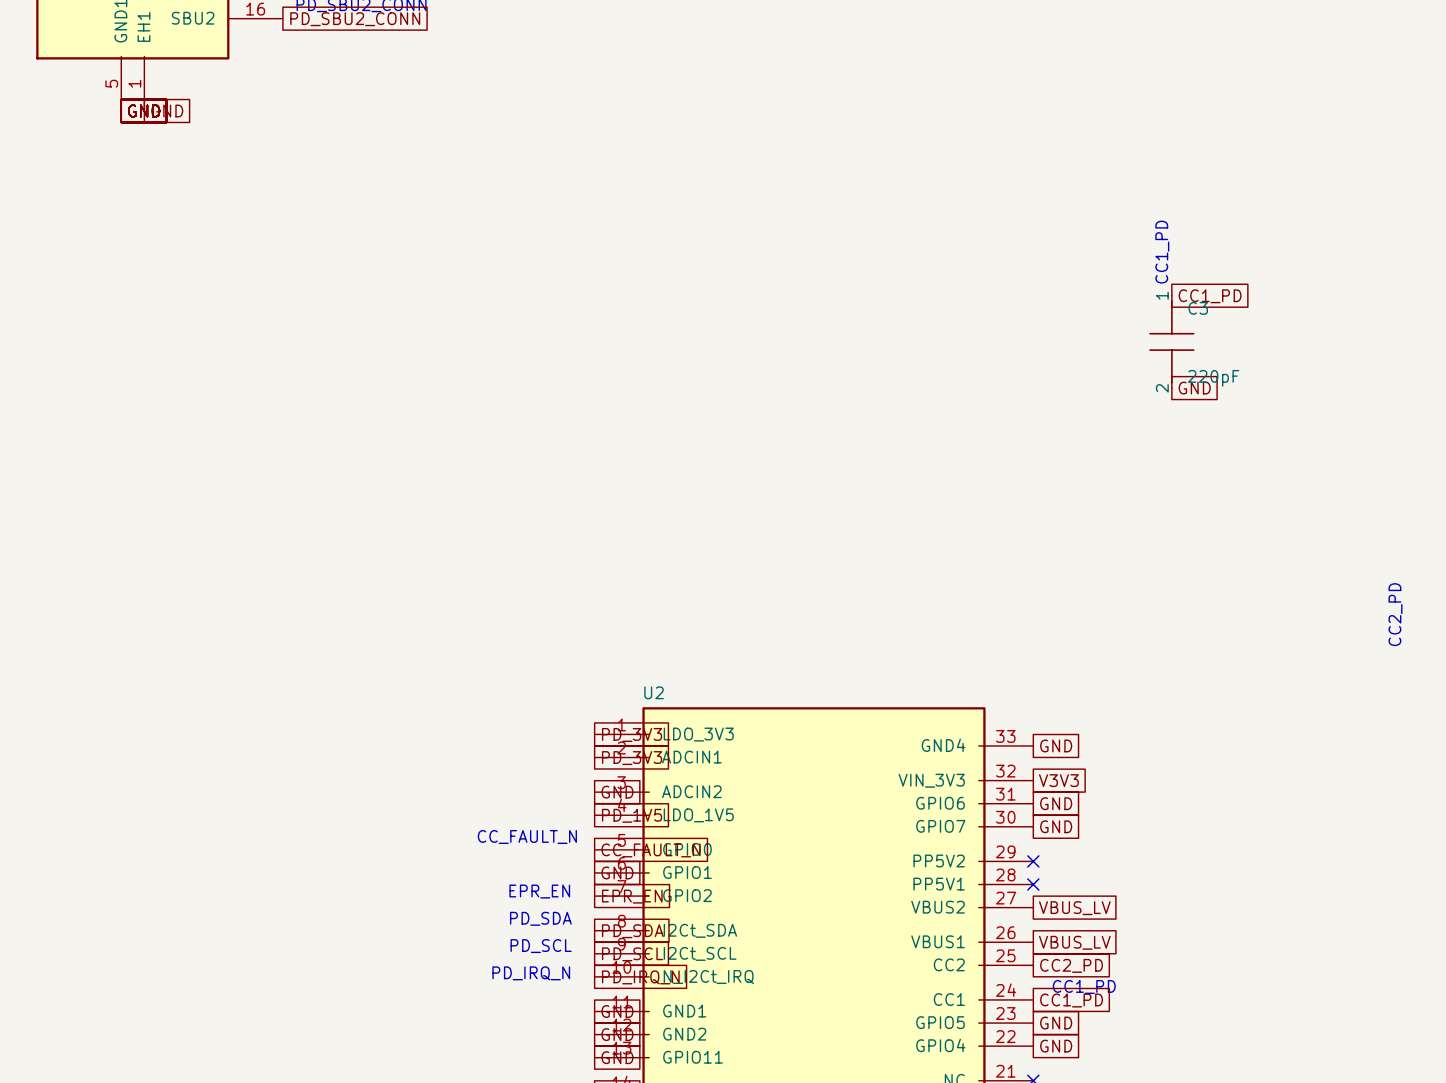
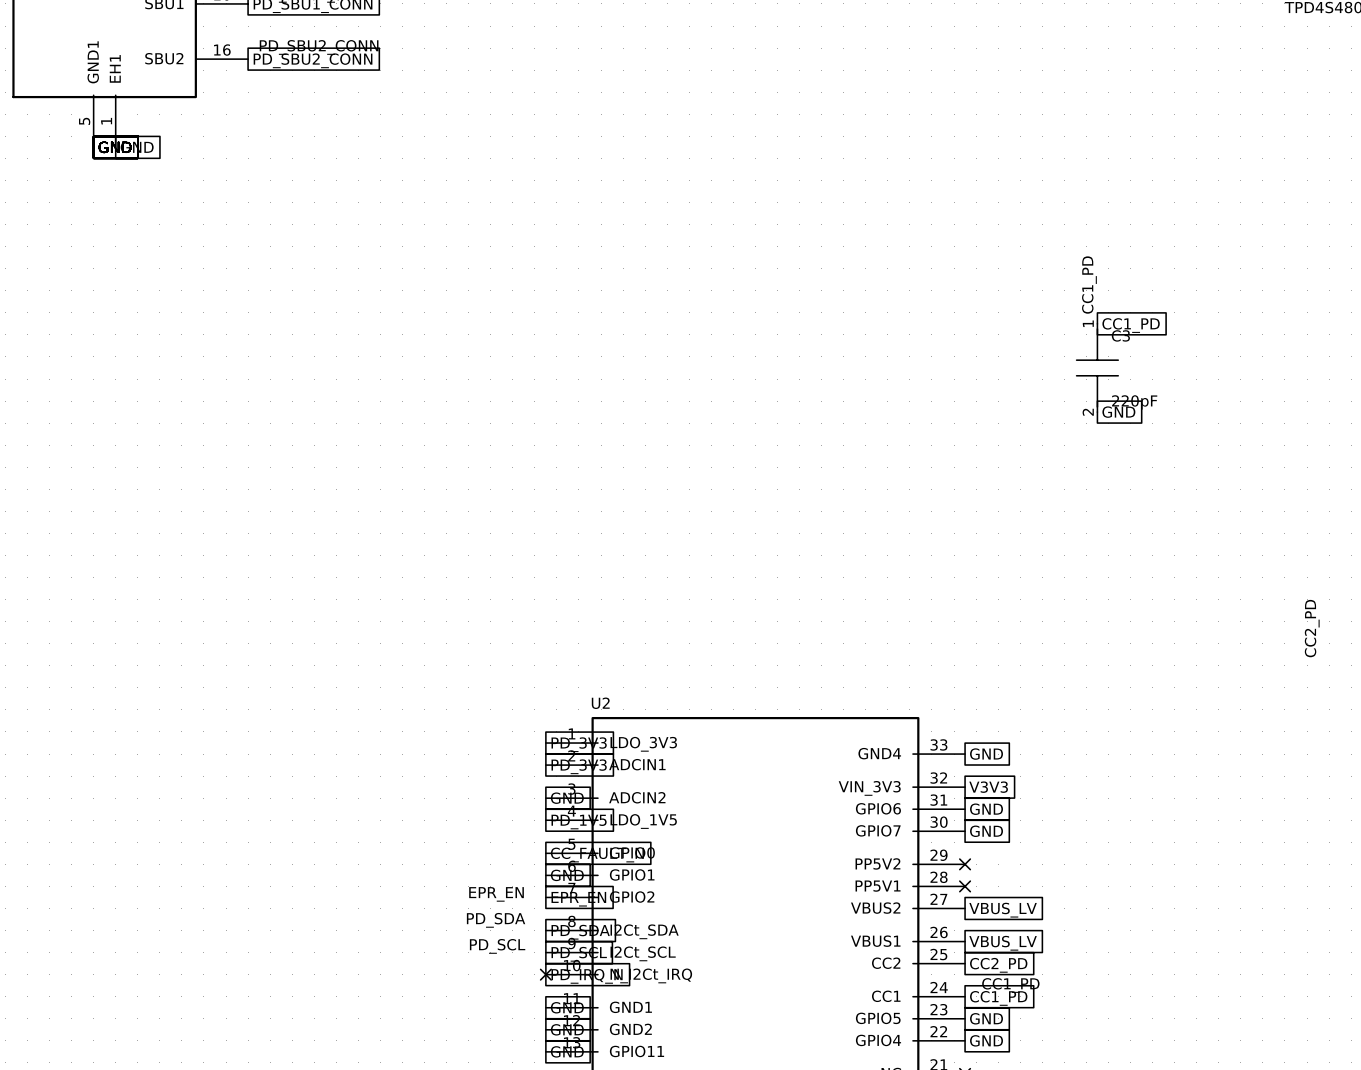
text: CC_FAULT_N (527, 837) -> none
text: PD_IRQ_N (531, 973) -> none
no-connect mark: none -> (545, 974)

